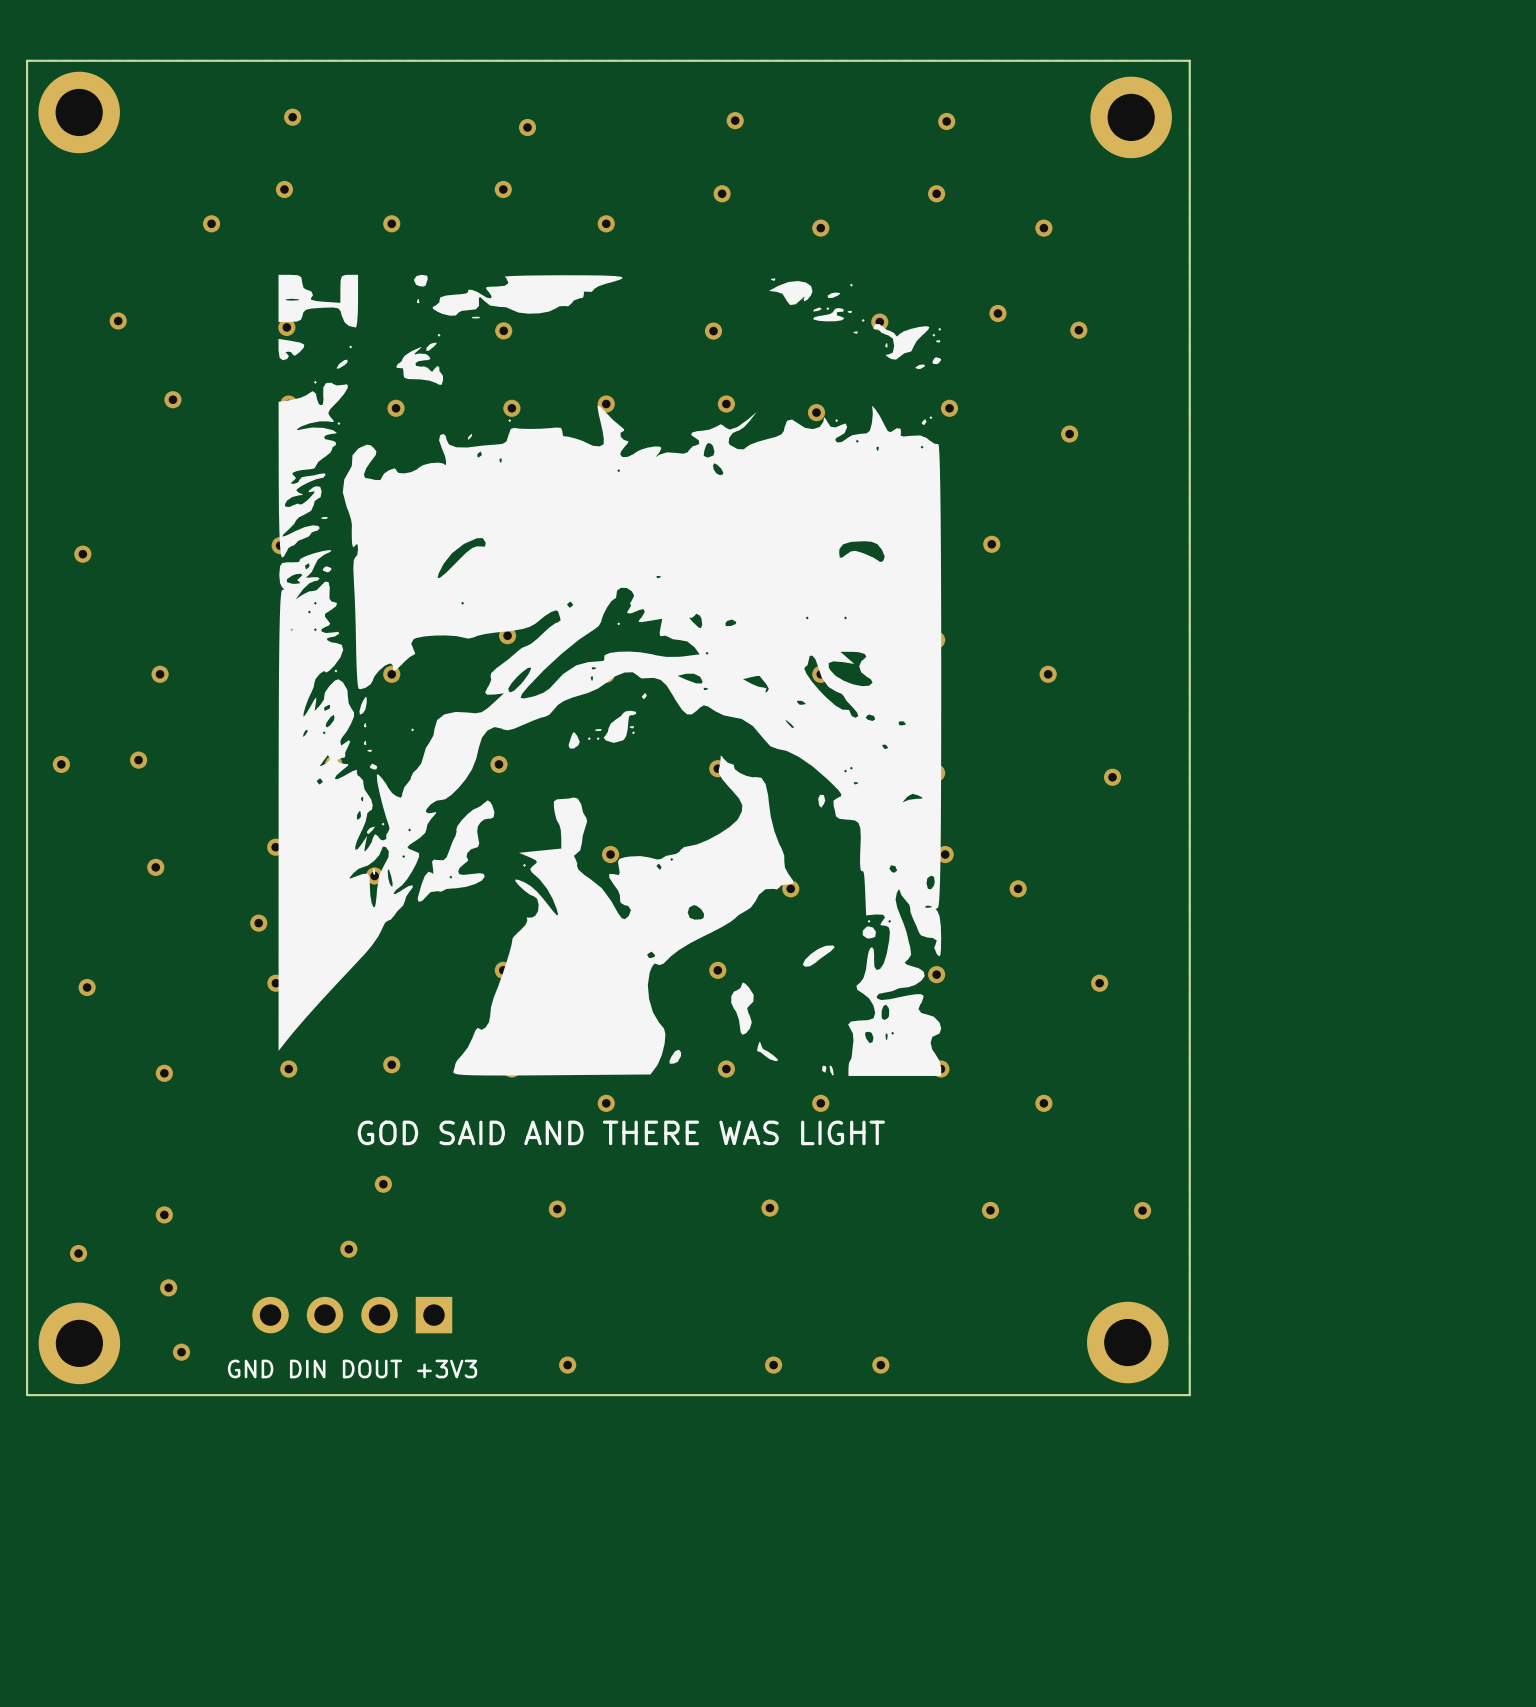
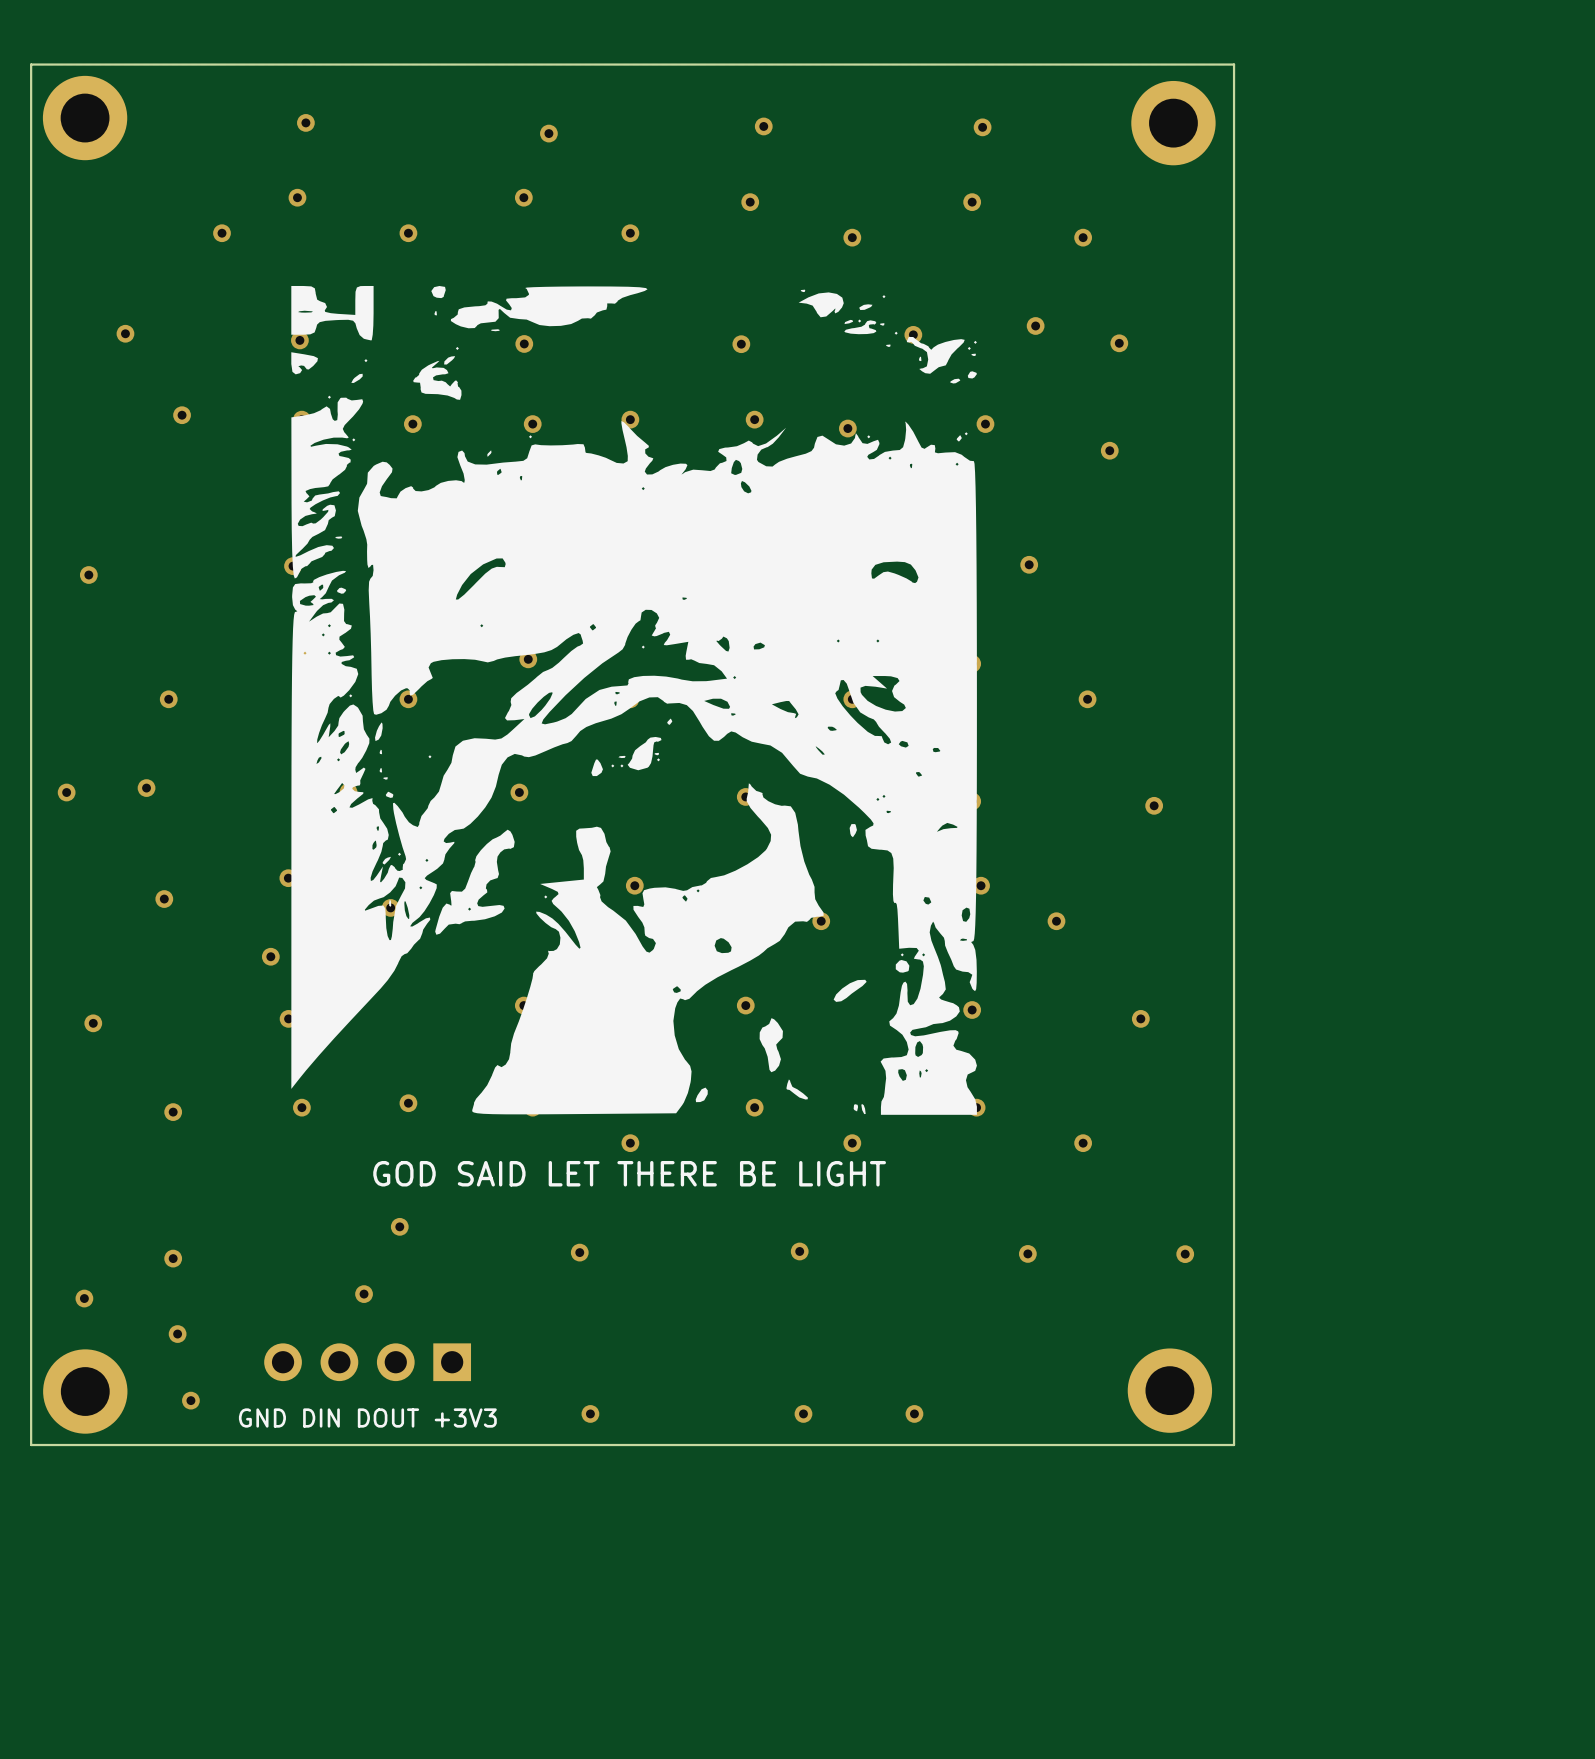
text: GOD SAID AND THERE WAS LIGHT (621, 1132) -> GOD SAID LET THERE BE LIGHT (629, 1173)

